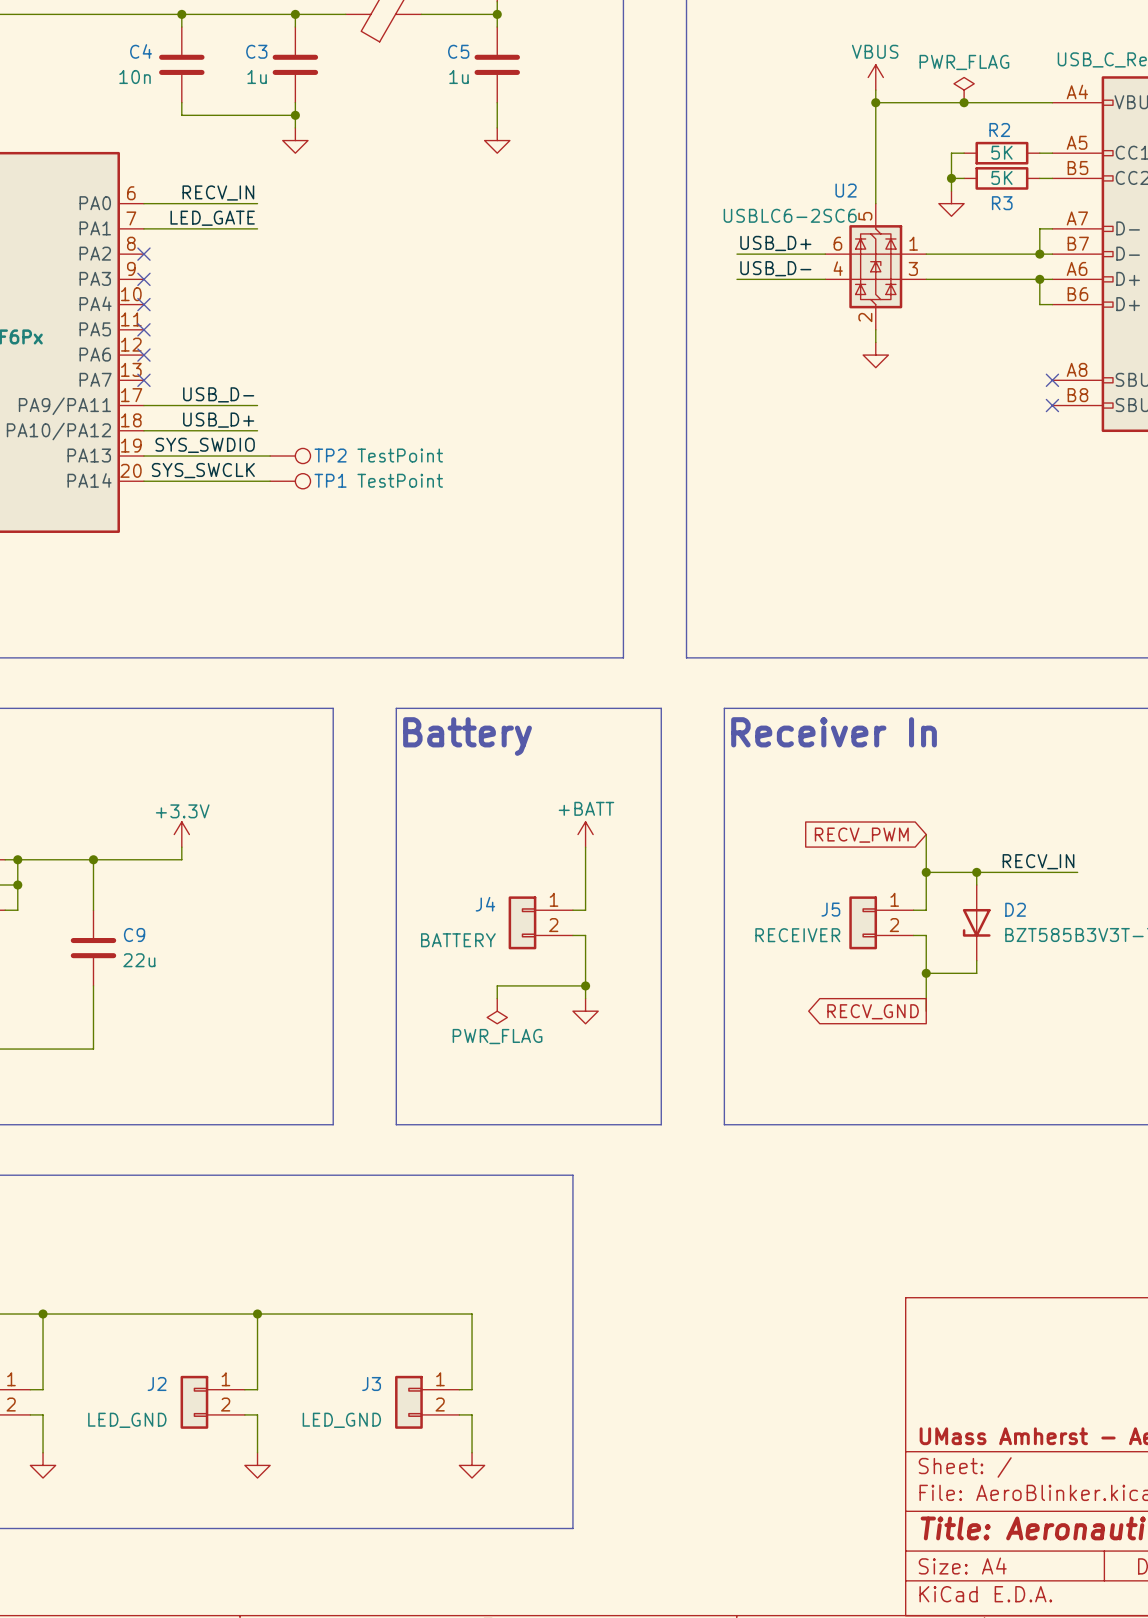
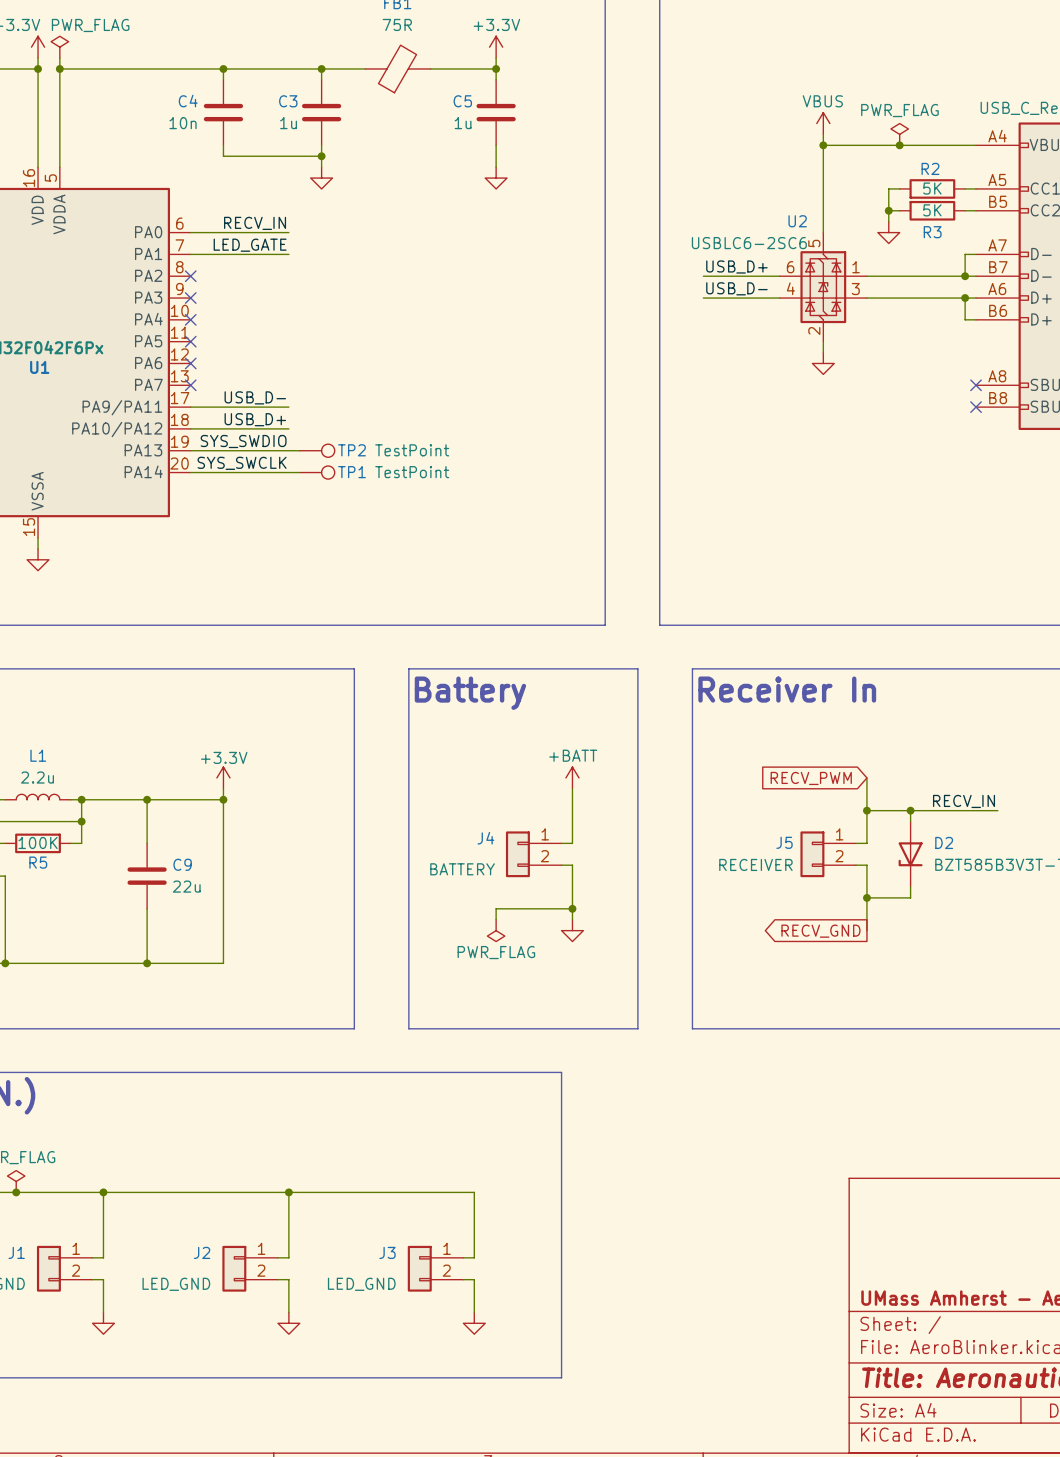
wire: none -> (223, 799) (223, 963) (147, 963)
junction: none -> (223, 799)
junction: none -> (147, 963)

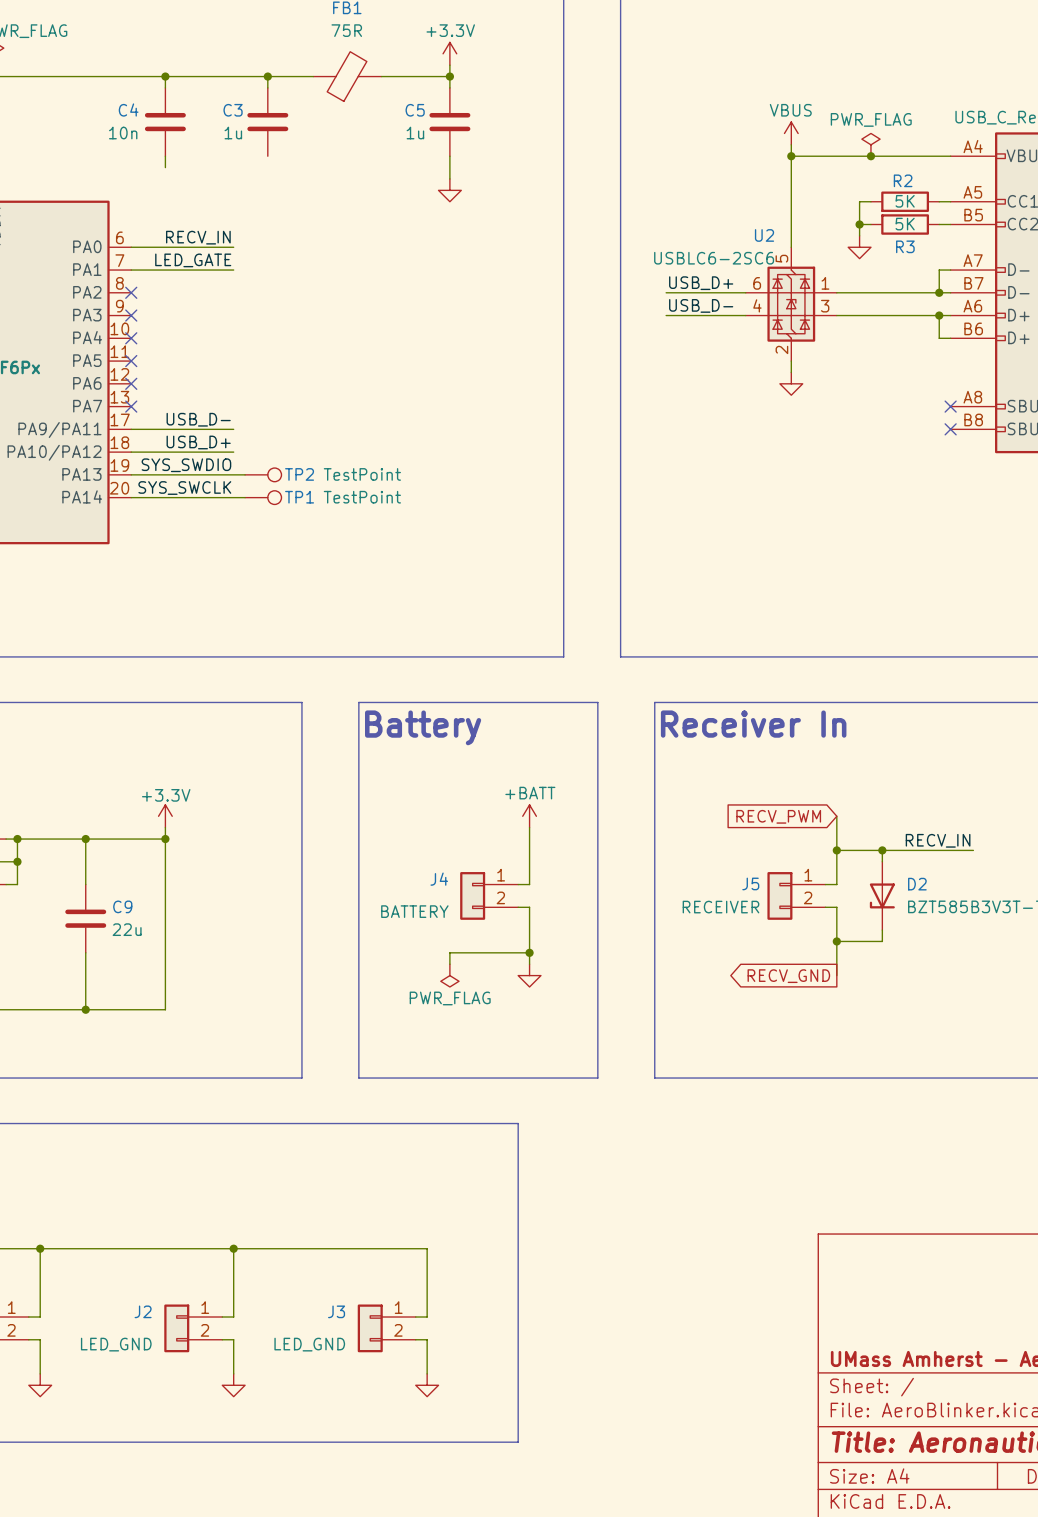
wire: (321, 145) (321, 167) -> none
wire: (223, 156) (321, 156) -> none
junction: (321, 156) -> none
power symbol: (321, 178) -> none

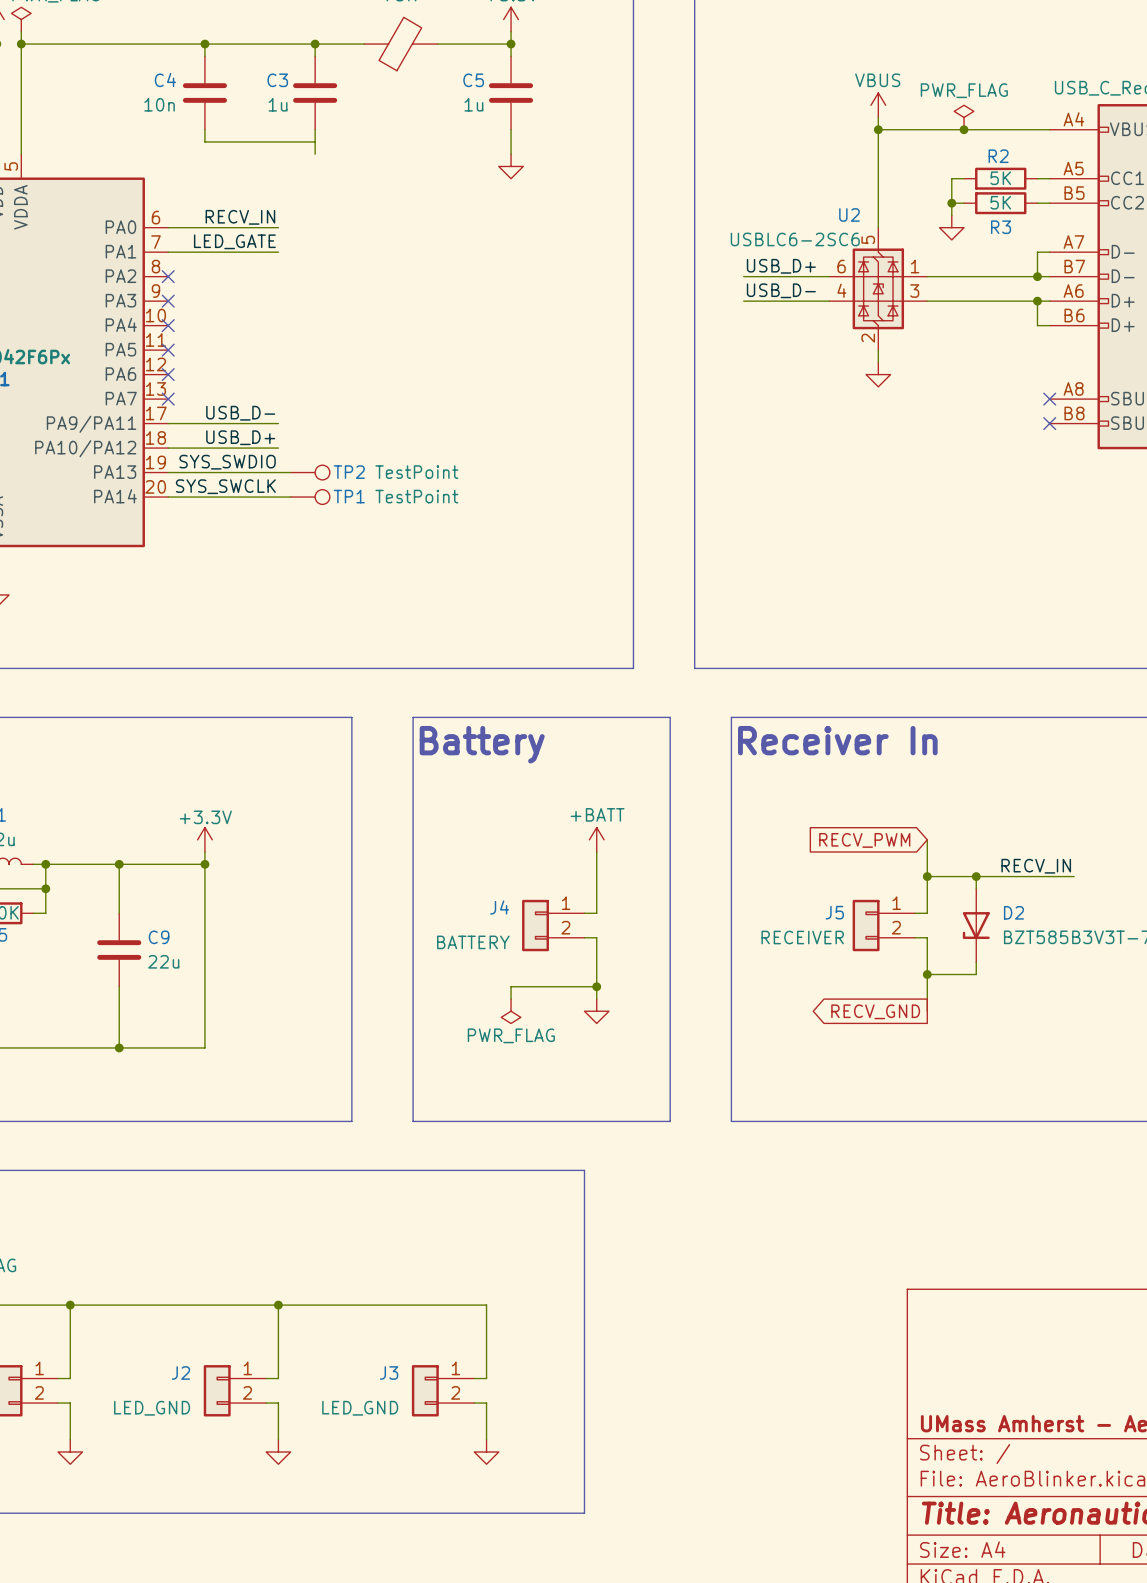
wire: none -> (315, 129) (315, 154)
wire: none -> (204, 141) (315, 141)

